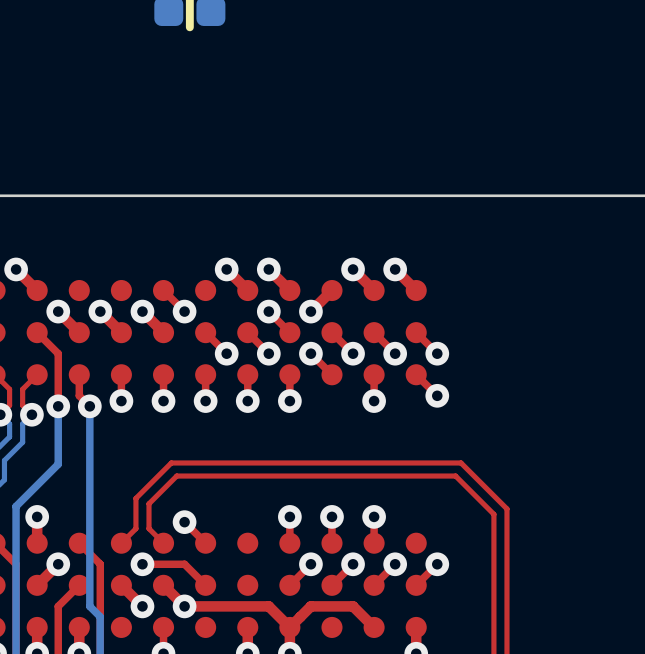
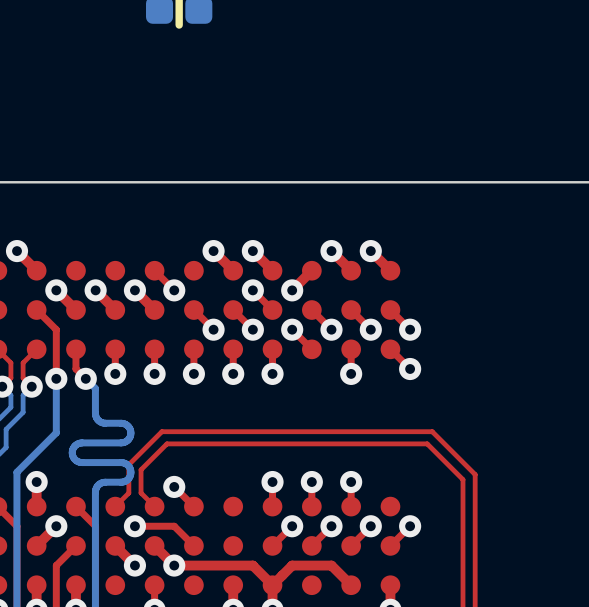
bottom track: (89, 406) (89, 606) (100, 616) -> (85, 378) (95, 388) (95, 413) (97, 419) (103, 423) (125, 424) (130, 433) (128, 439) (123, 442) (79, 443) (72, 450) (74, 458) (79, 462) (123, 462) (130, 470) (129, 476) (125, 481) (103, 482) (95, 489) (95, 575)

